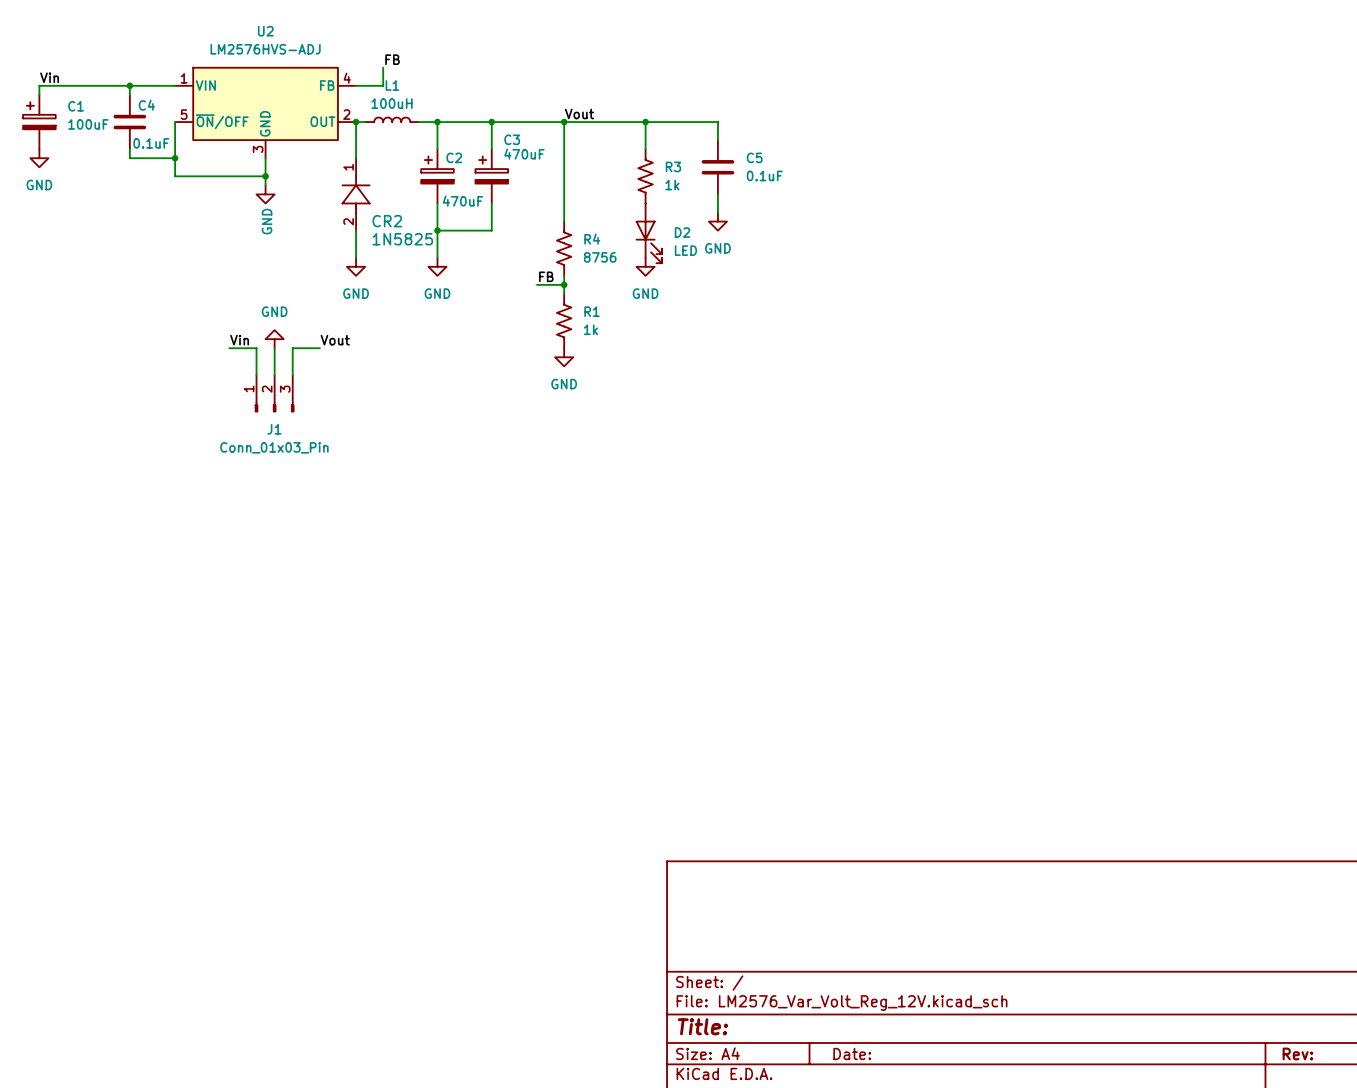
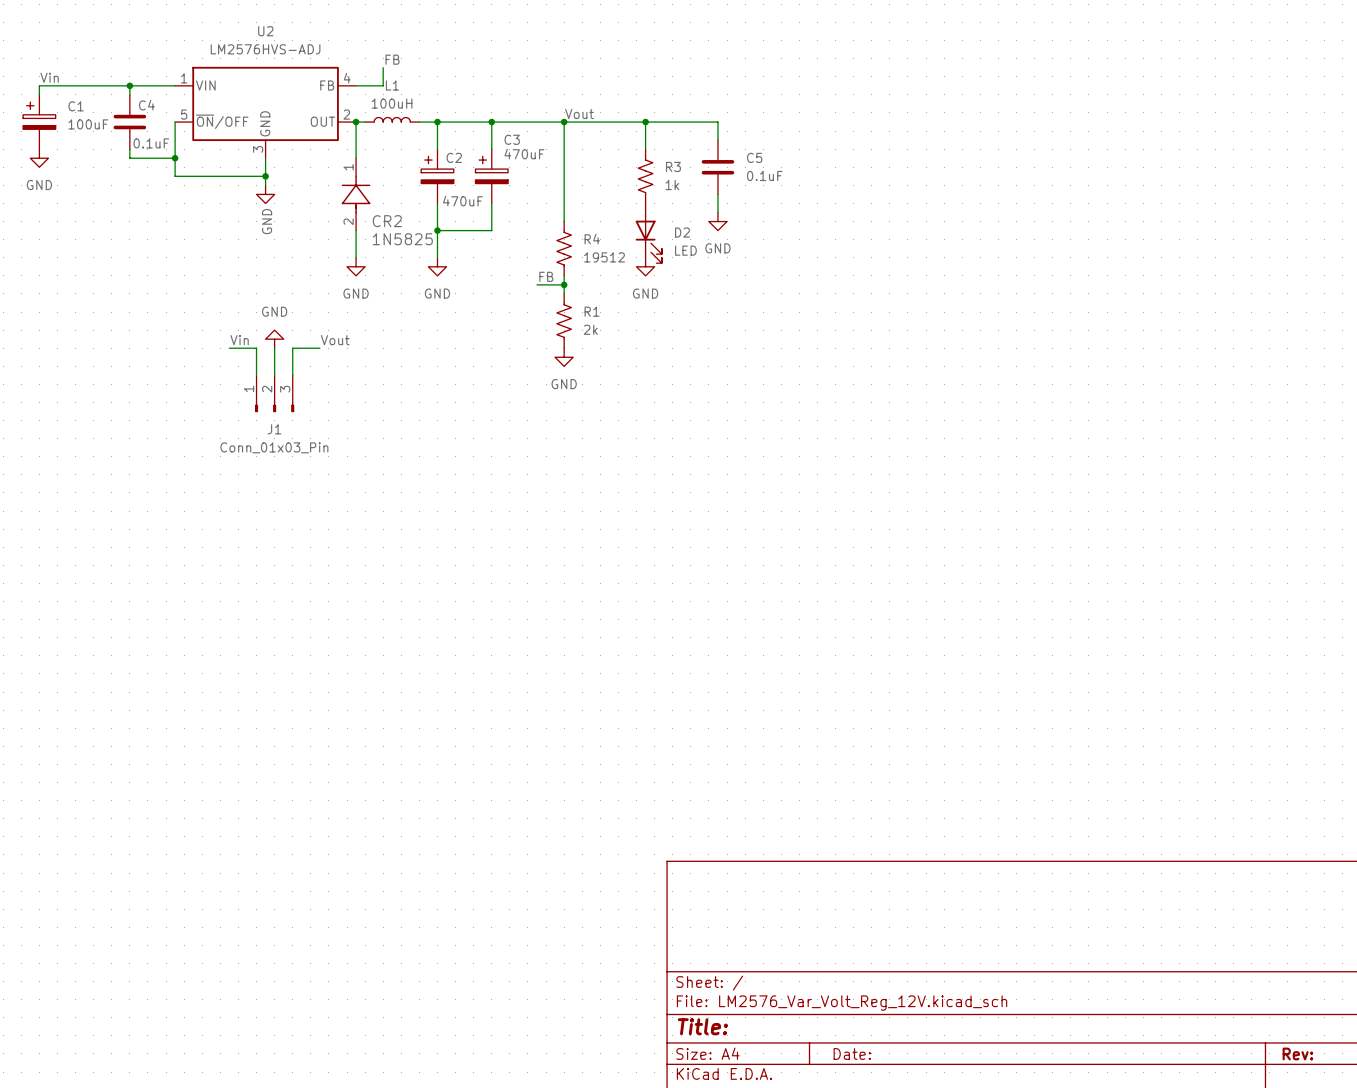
R4 value: 8756 (600, 257) -> 19512 (604, 257)
R1 value: 1k (590, 329) -> 2k (590, 329)

